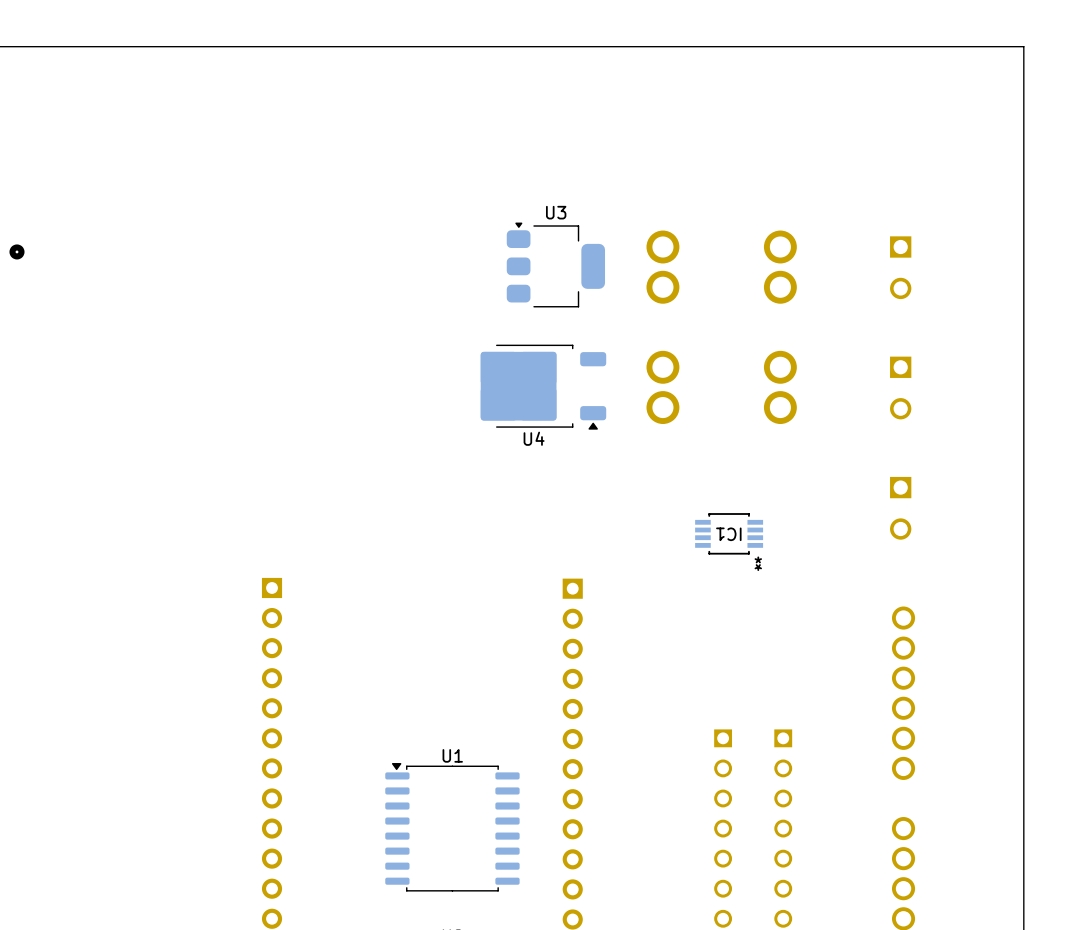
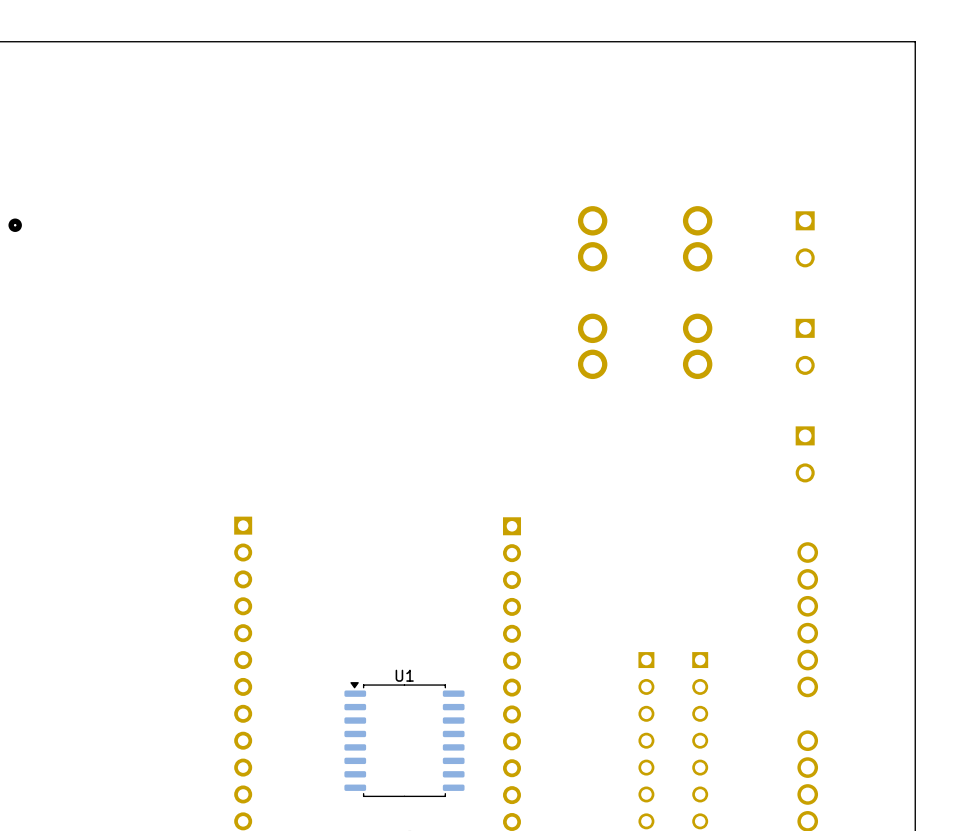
U3: (555, 265) -> none
U4: (543, 387) -> none
IC1: (729, 533) -> none

